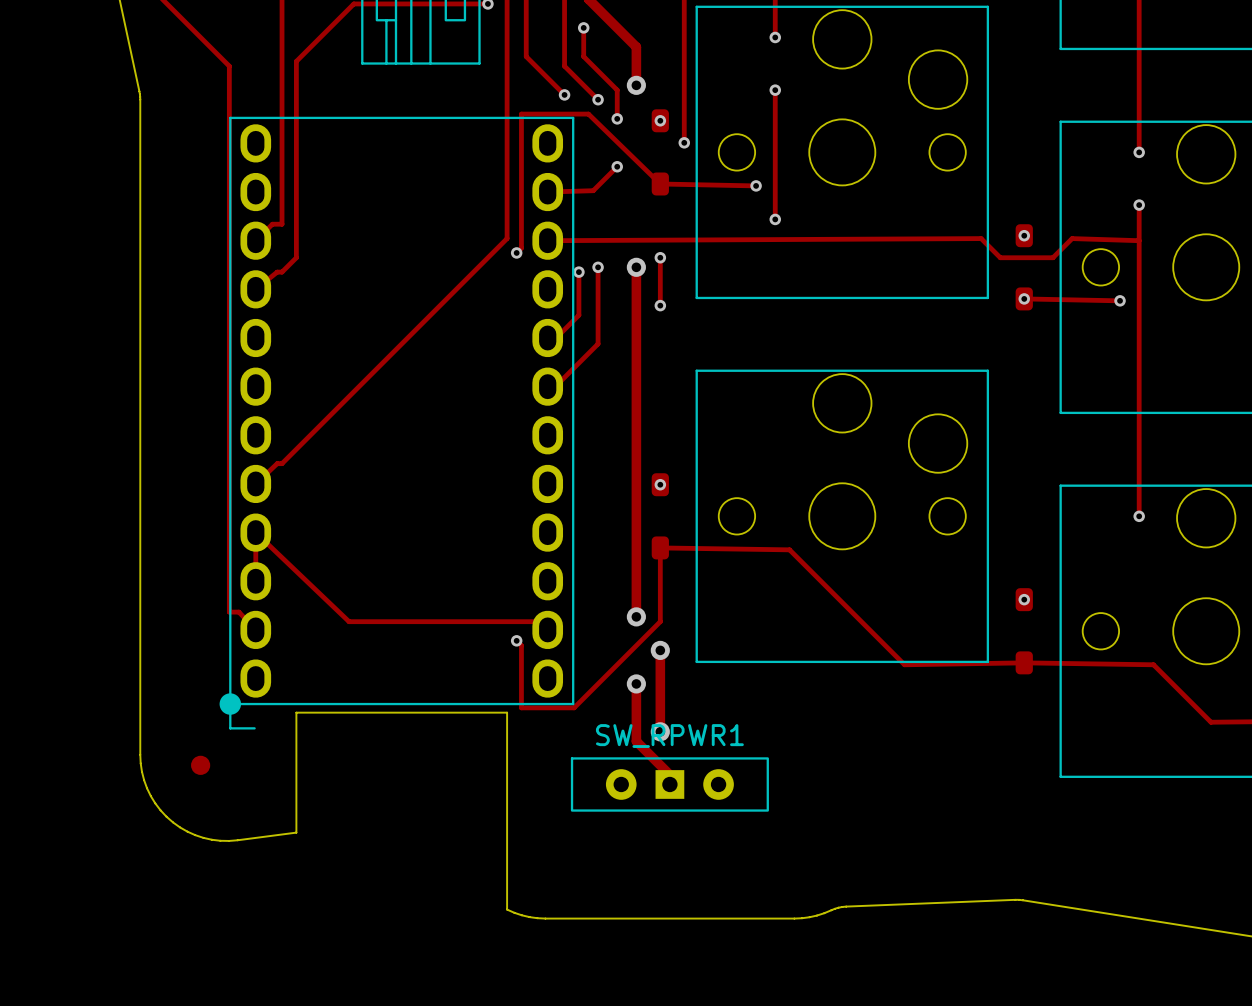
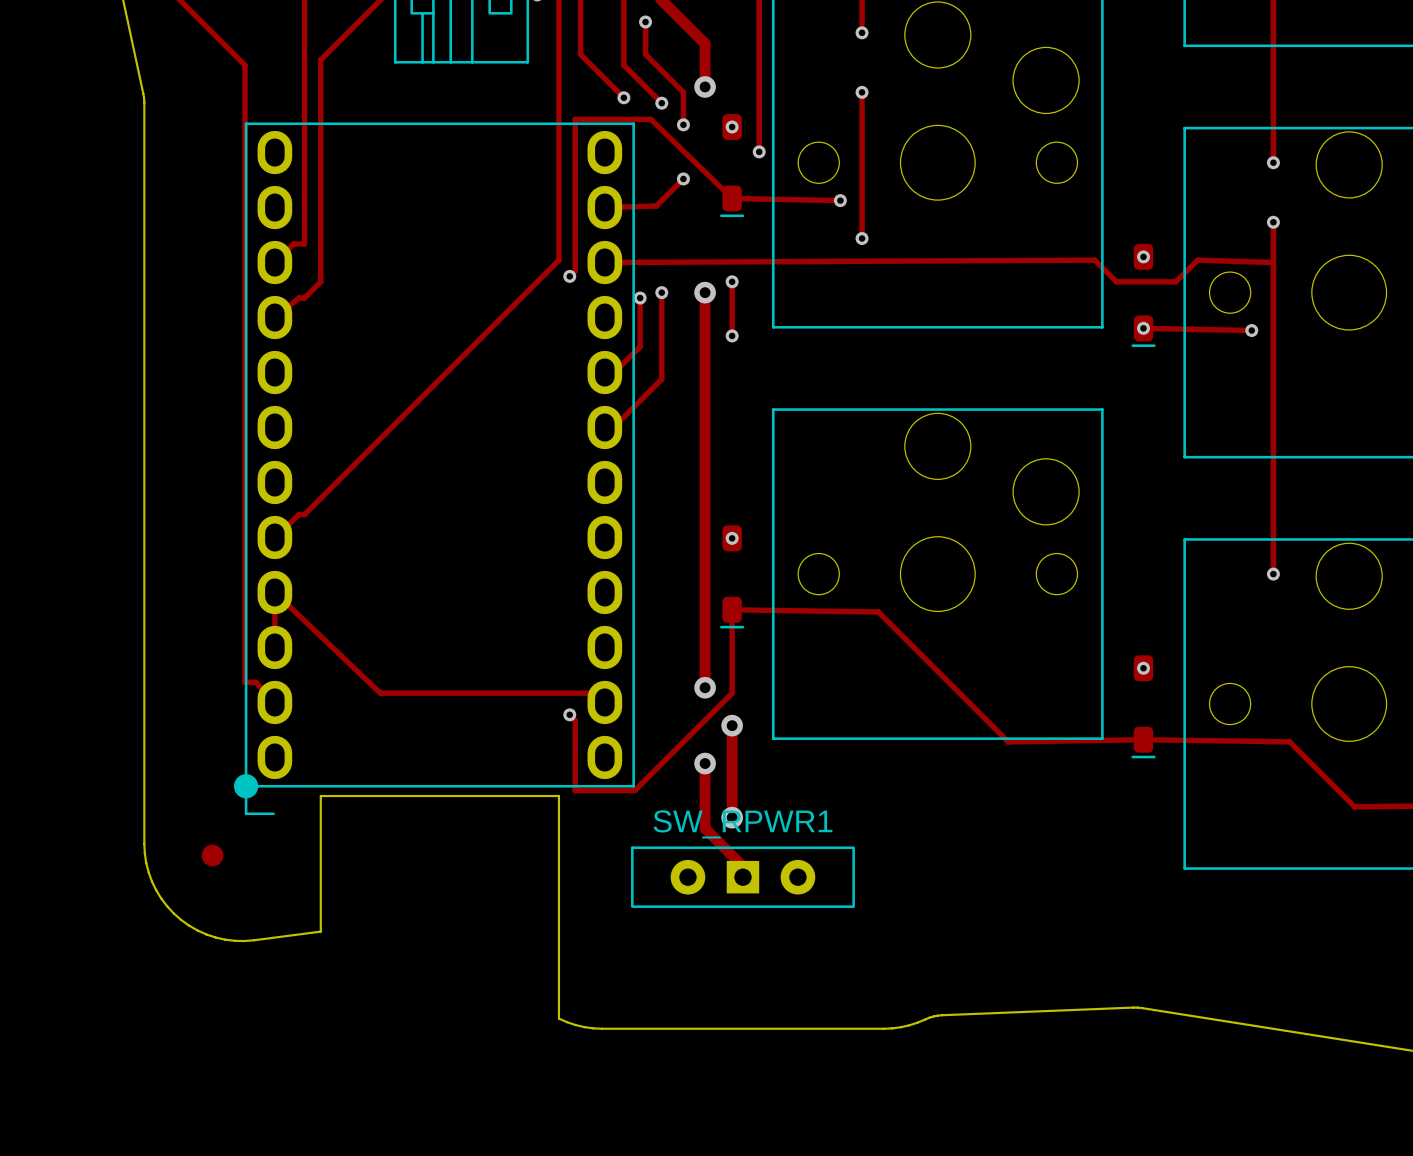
part footprint: [651, 109, 669, 196] -> [720, 114, 745, 218]
part footprint: [1015, 224, 1033, 311] -> [1131, 243, 1156, 347]
part footprint: [651, 473, 669, 560] -> [720, 525, 745, 629]
part footprint: [1015, 588, 1033, 675] -> [1131, 655, 1156, 759]

